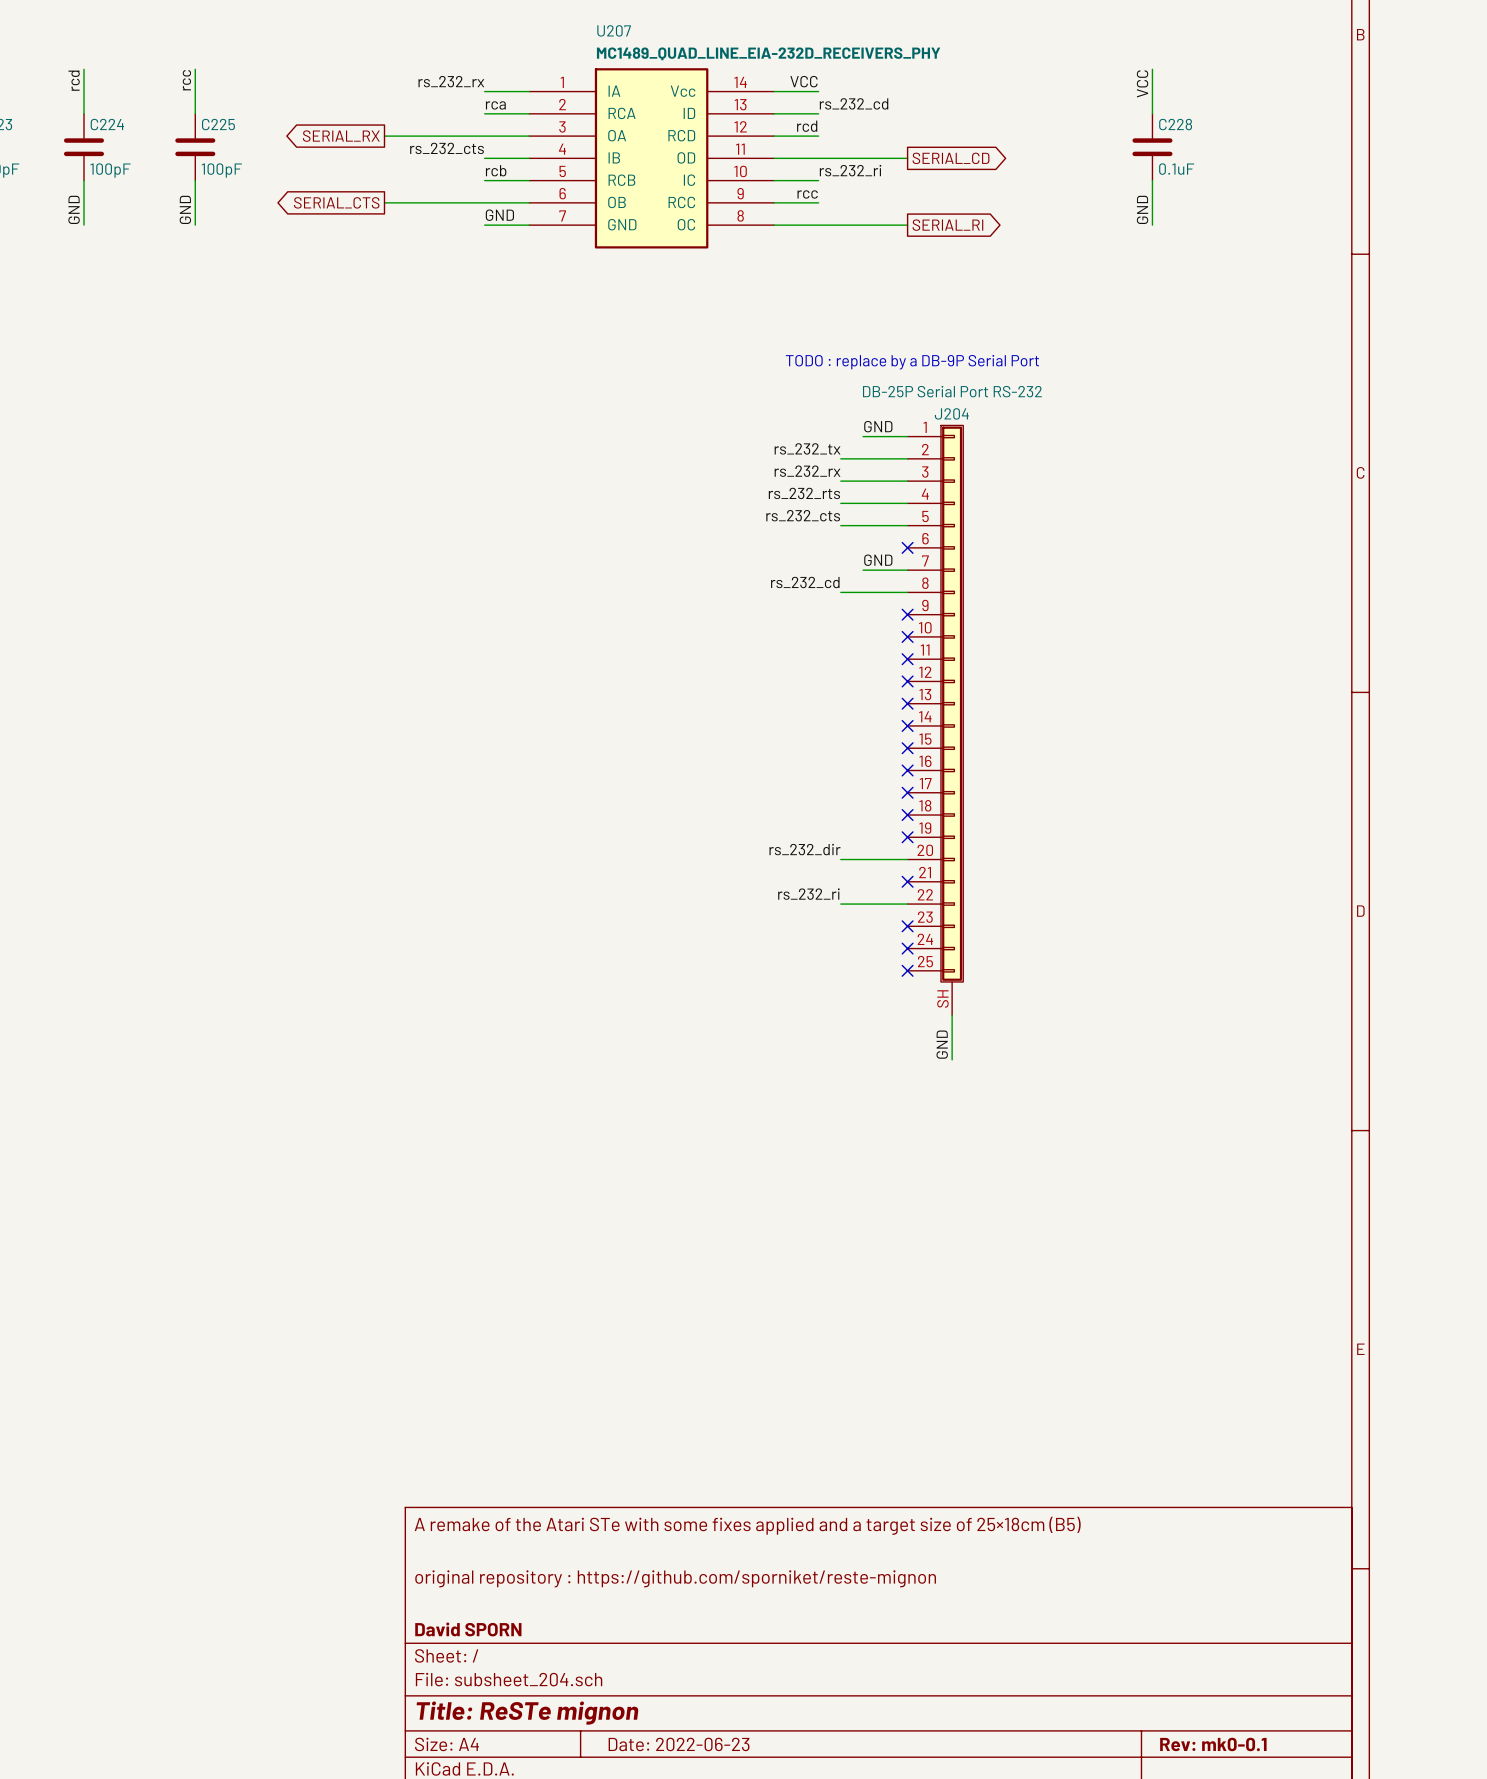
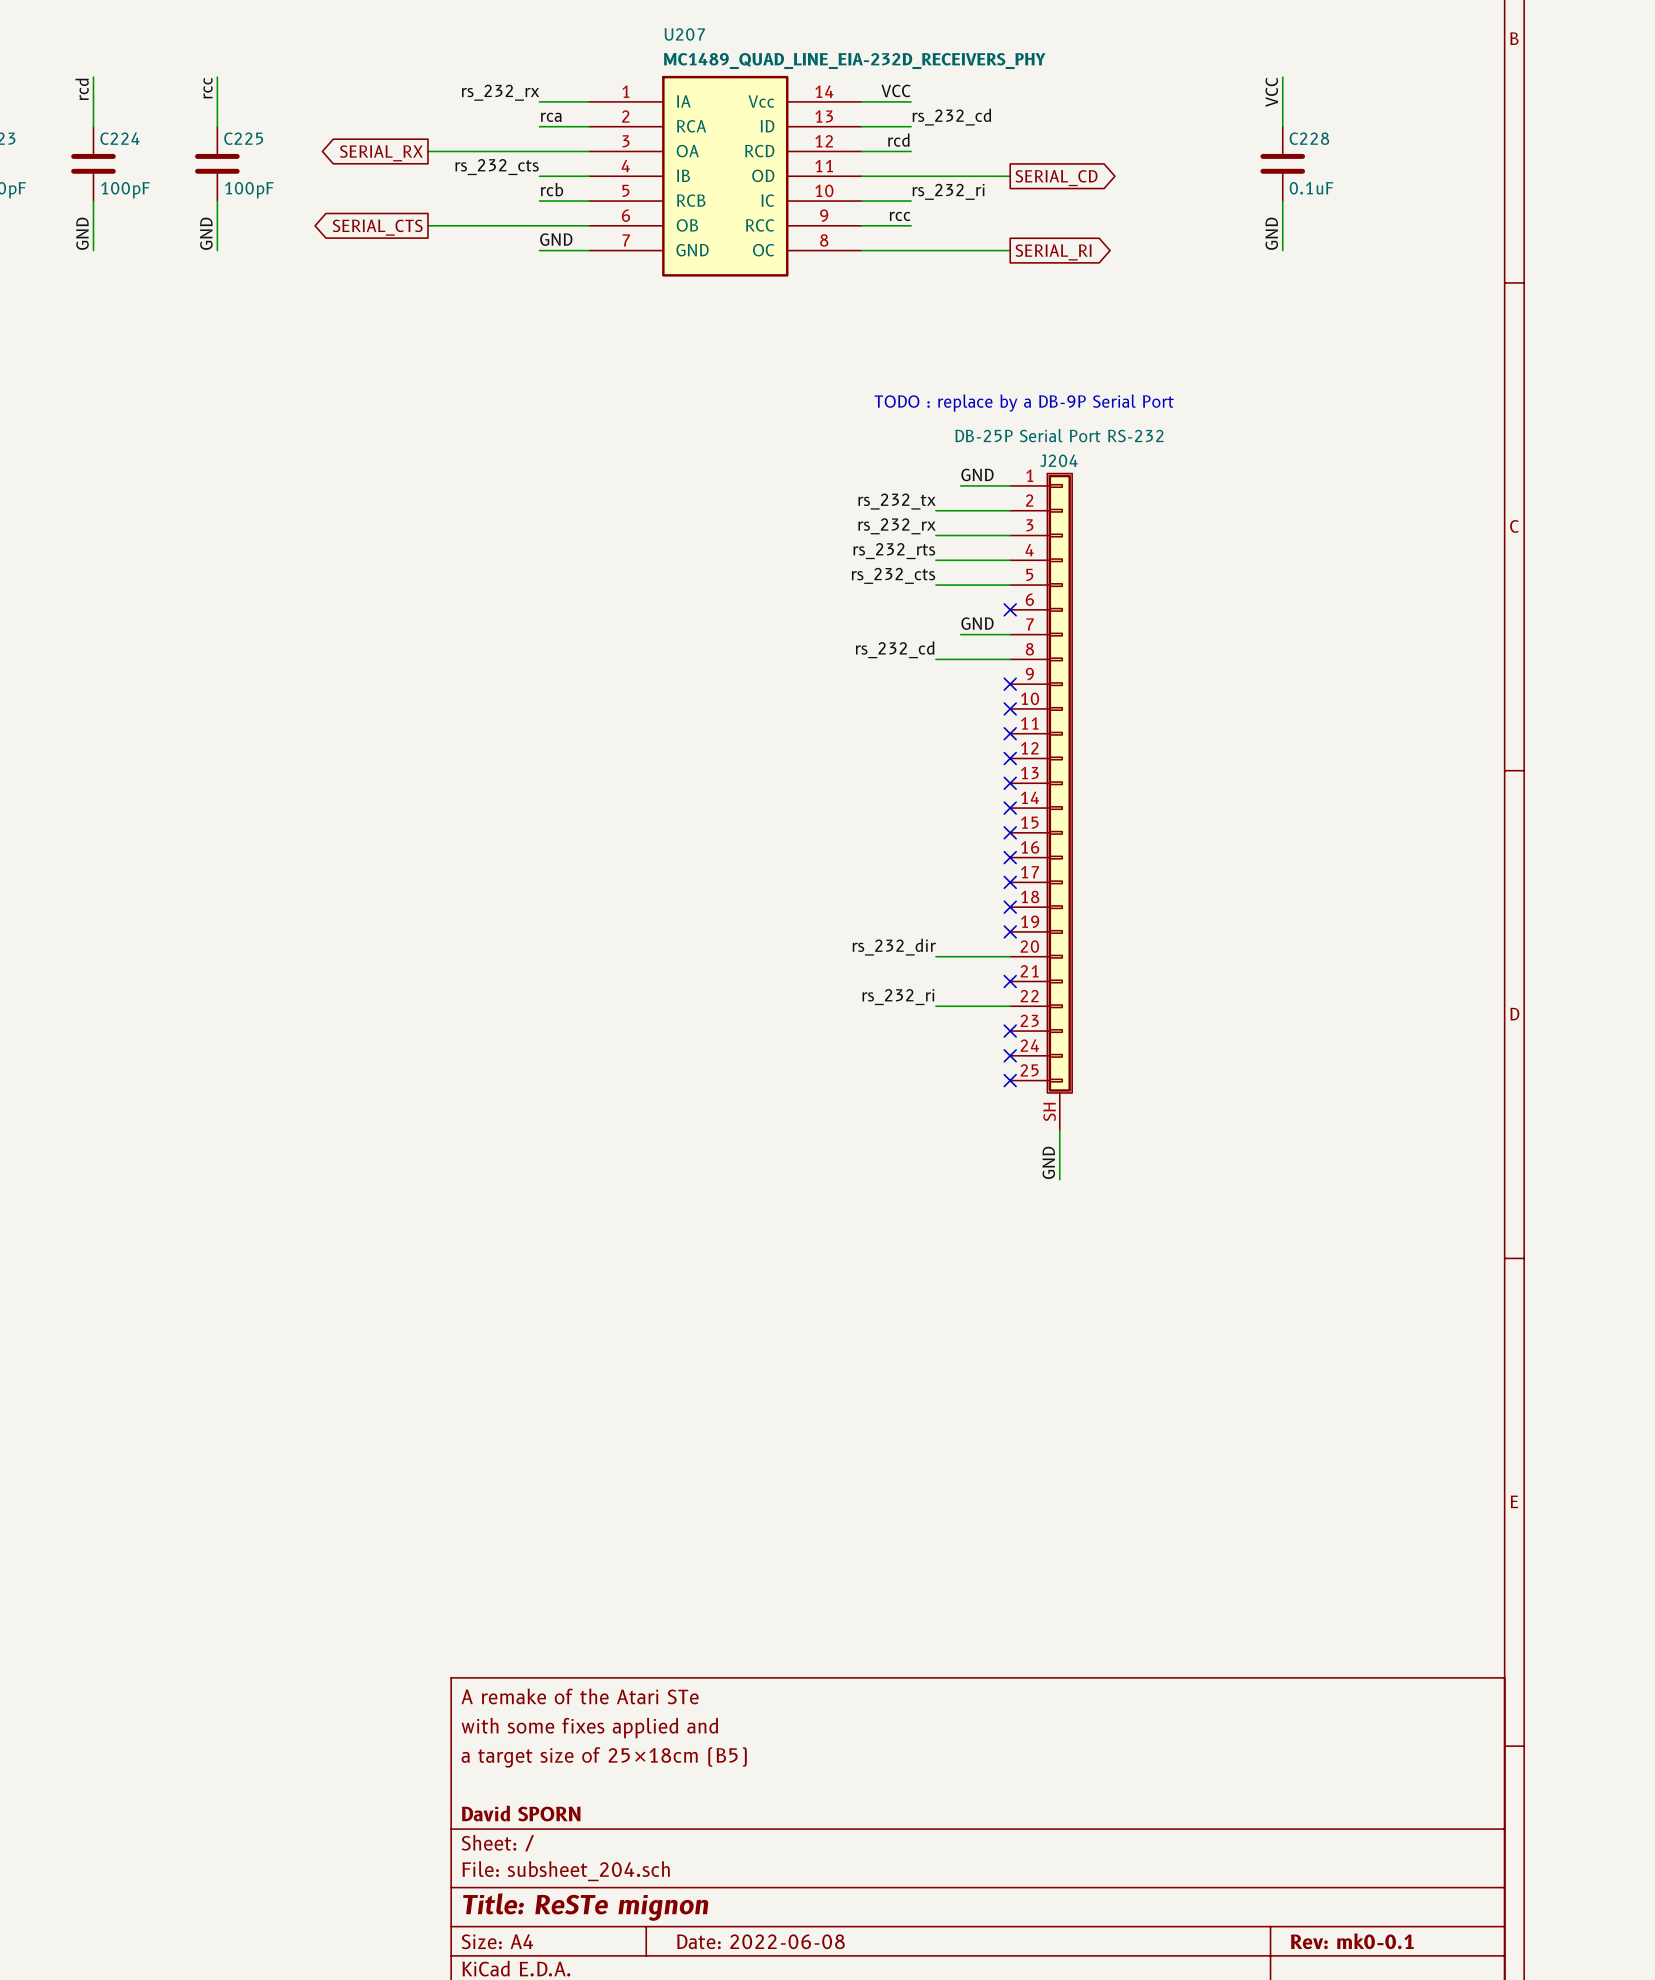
title block: A remake of the Atari STe with some fixes applied and a target size of 25×18cm (B5) (747, 1525) -> A remake of the Atari STe (580, 1696)
title block: none -> with some fixes applied and (589, 1728)
title block: original repository : https://github.com/sporniket/reste-mignon (675, 1578) -> a target size of 25×18cm (B5) (604, 1757)
title block: Date: 2022-06-23 (679, 1744) -> Date: 2022-06-08 (760, 1941)

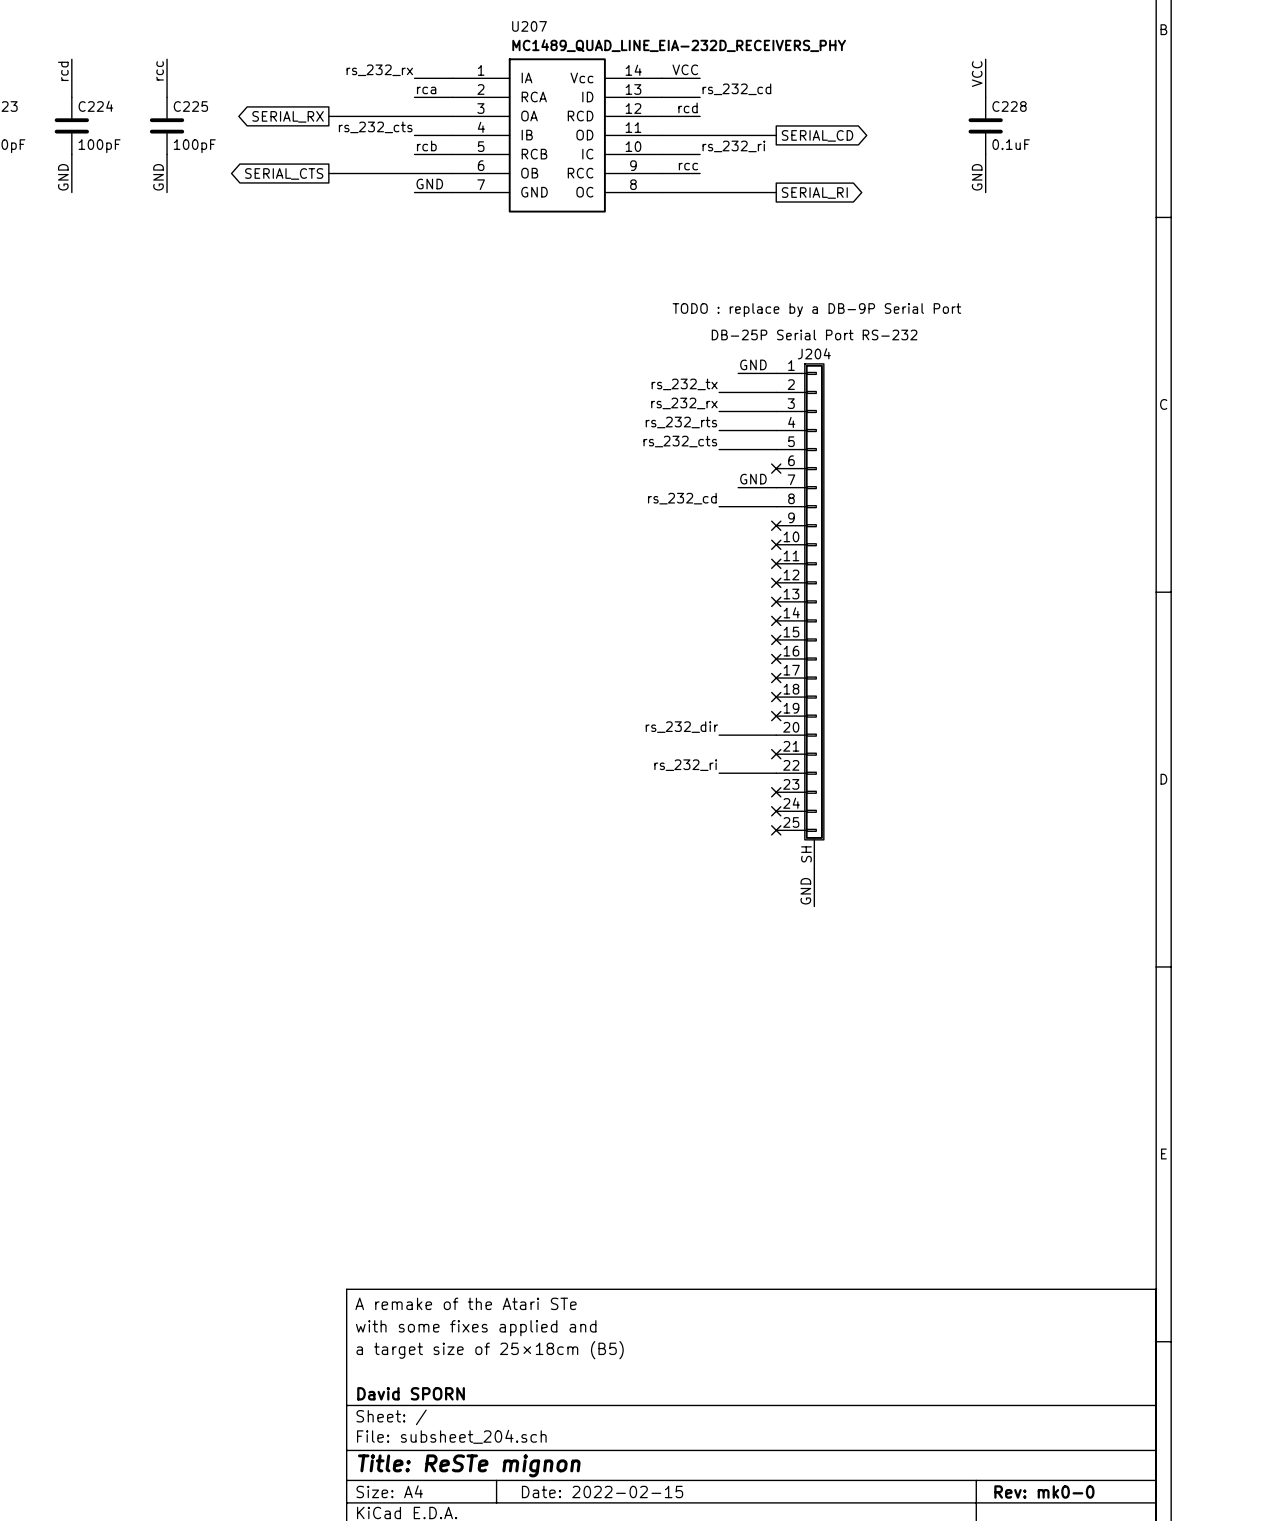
title block: Date: 2022-06-08 (760, 1941) -> Date: 2022-02-15 (602, 1491)
title block: Rev: mk0-0.1 (1352, 1941) -> Rev: mk0-0 (1044, 1491)

